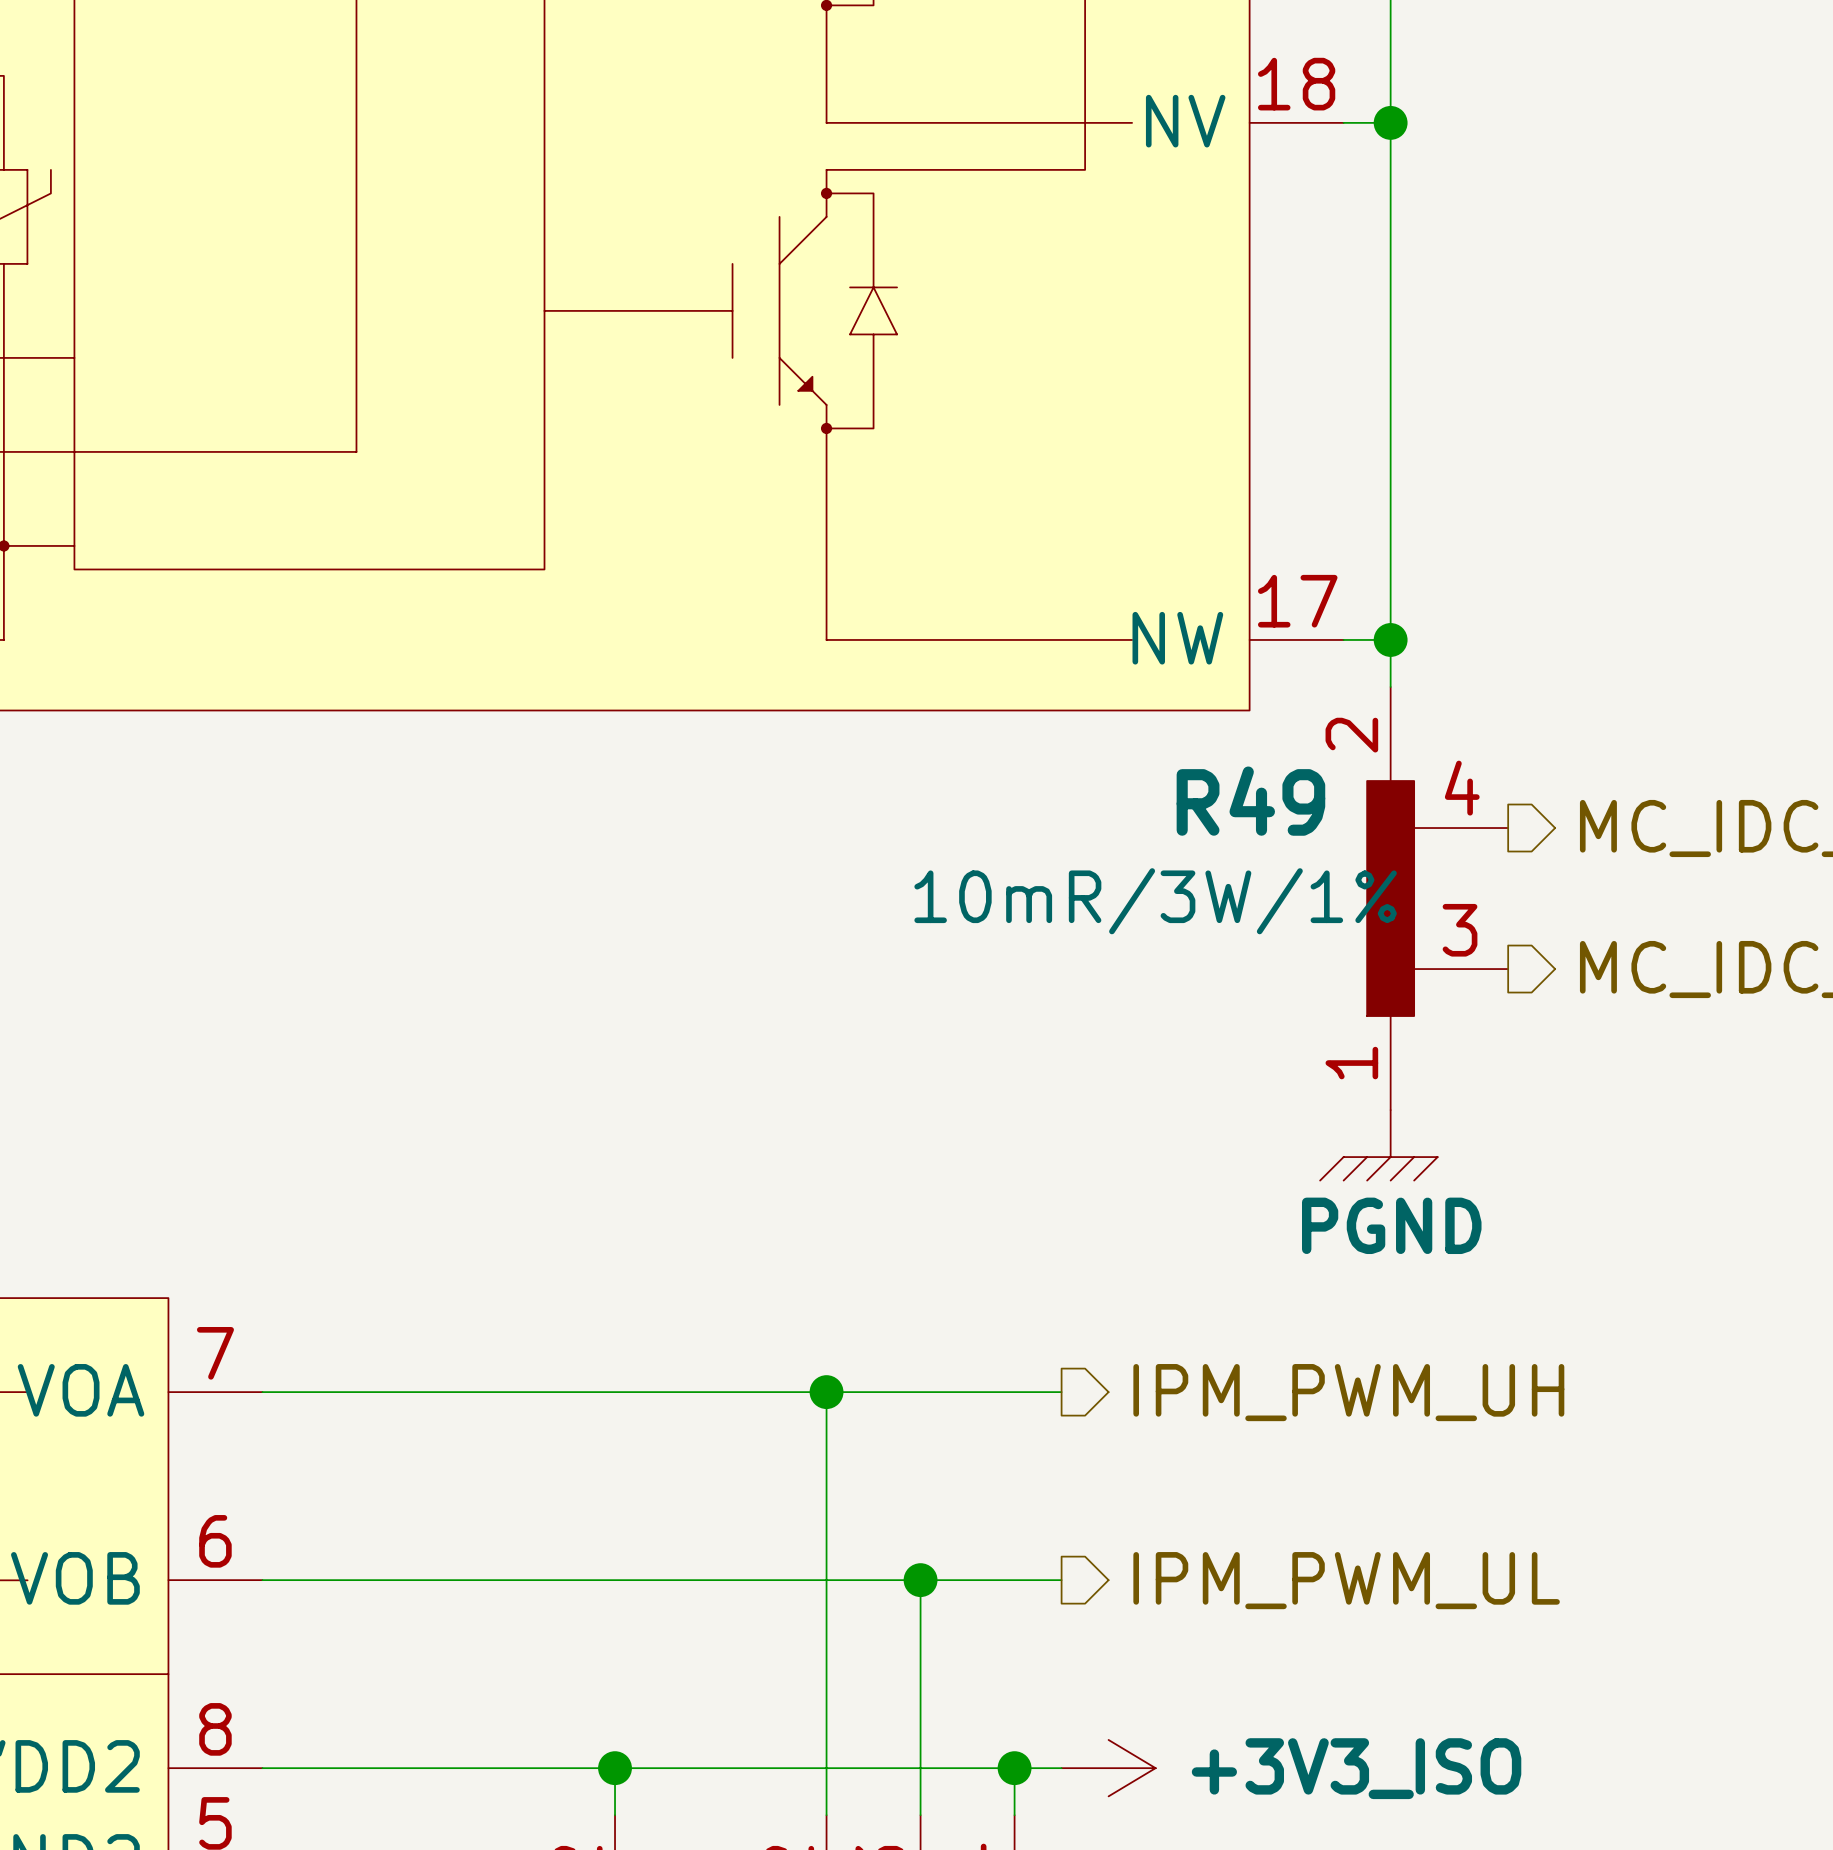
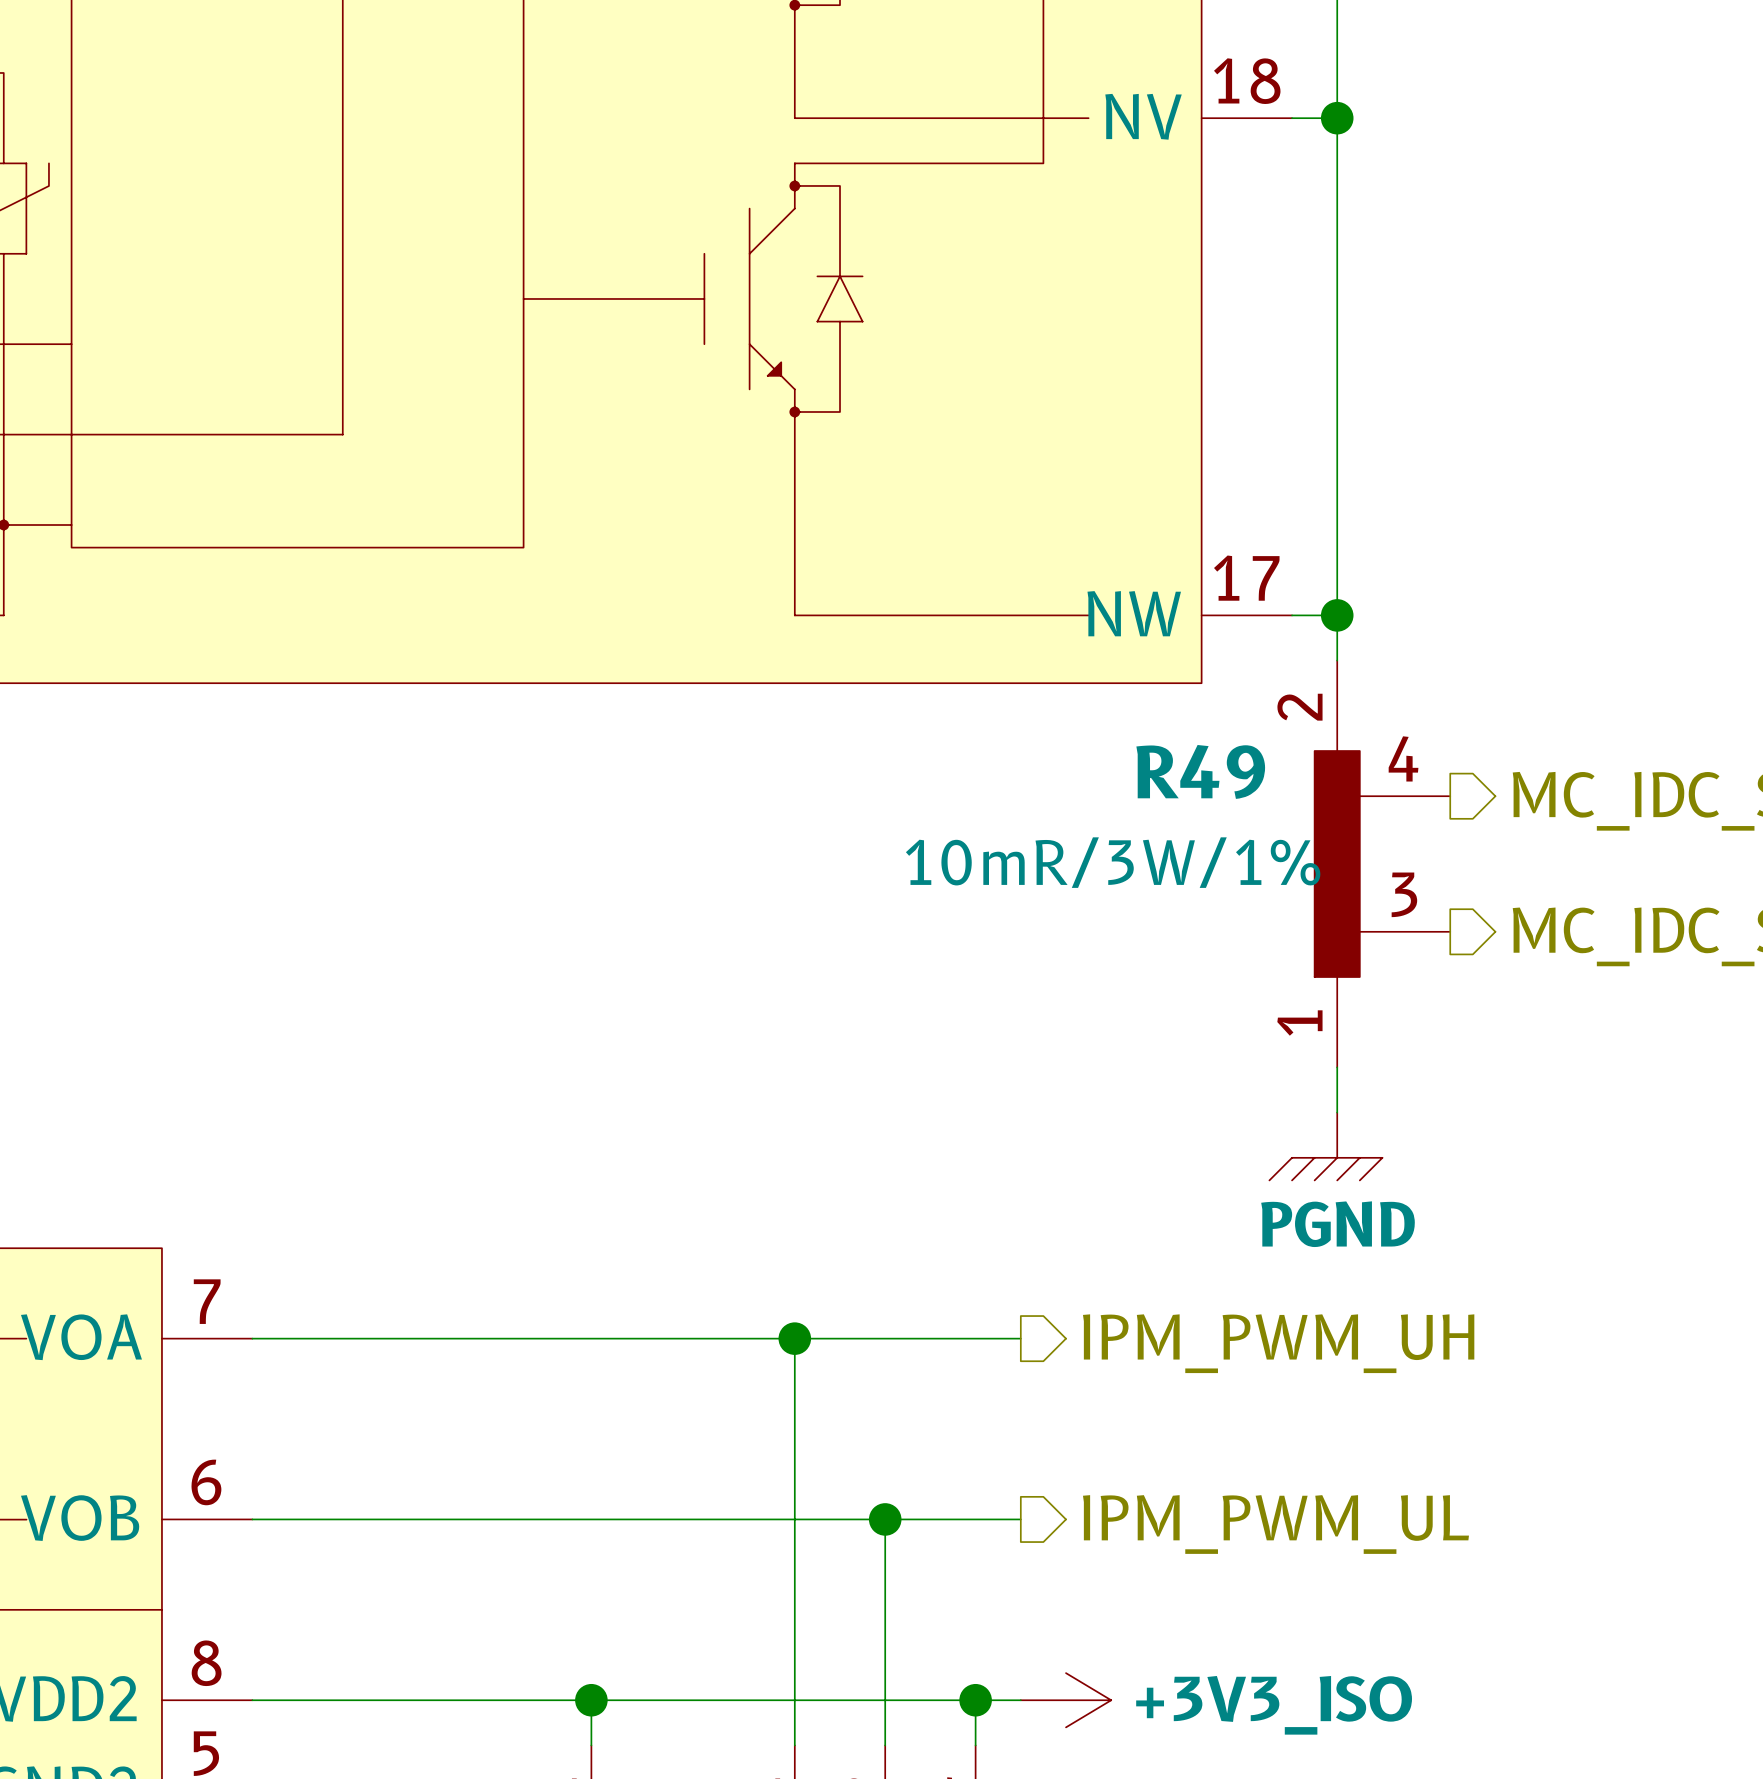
power symbol position: PGND (1378, 1145) -> PGND (1325, 1146)

